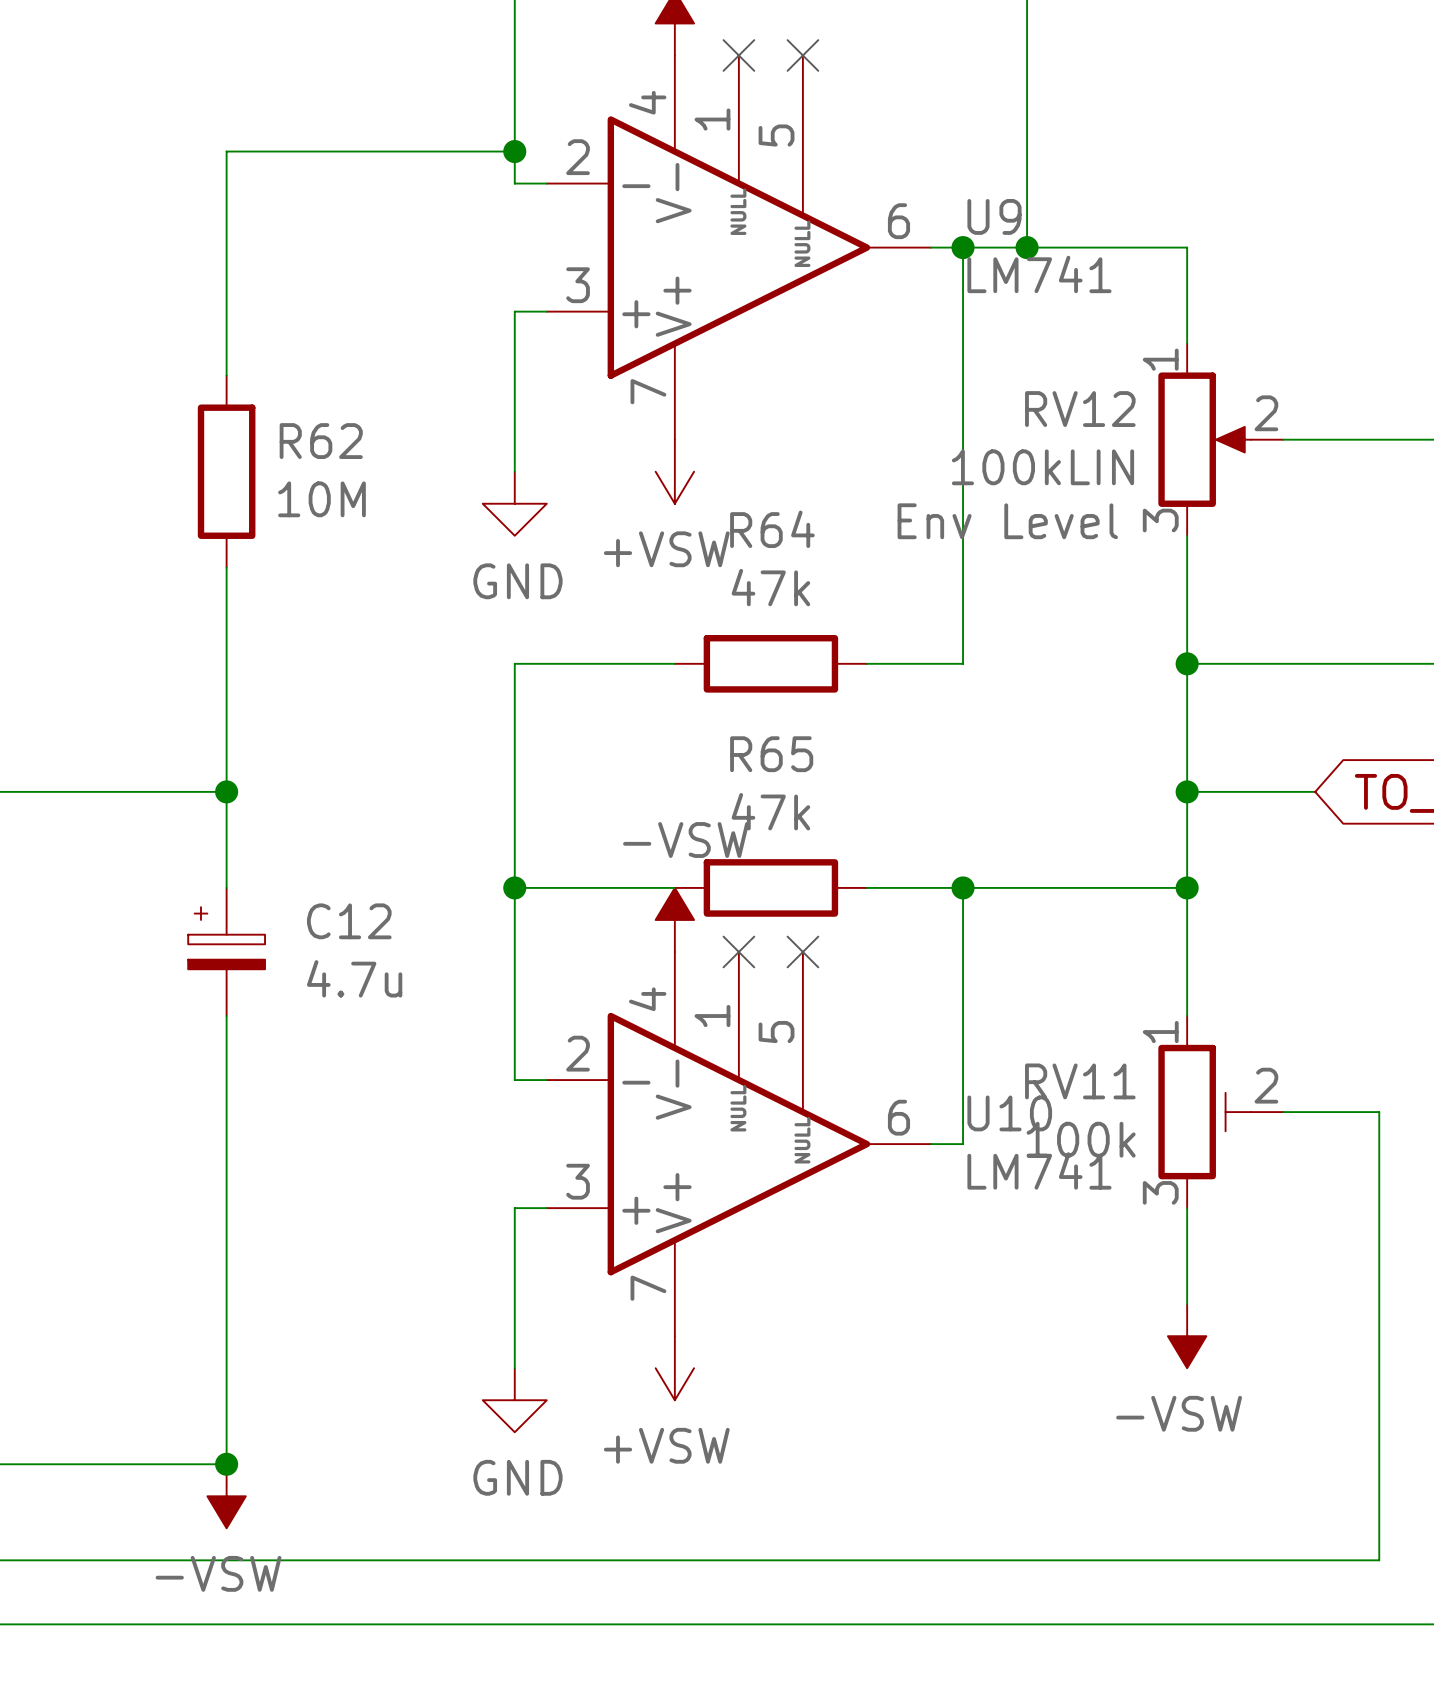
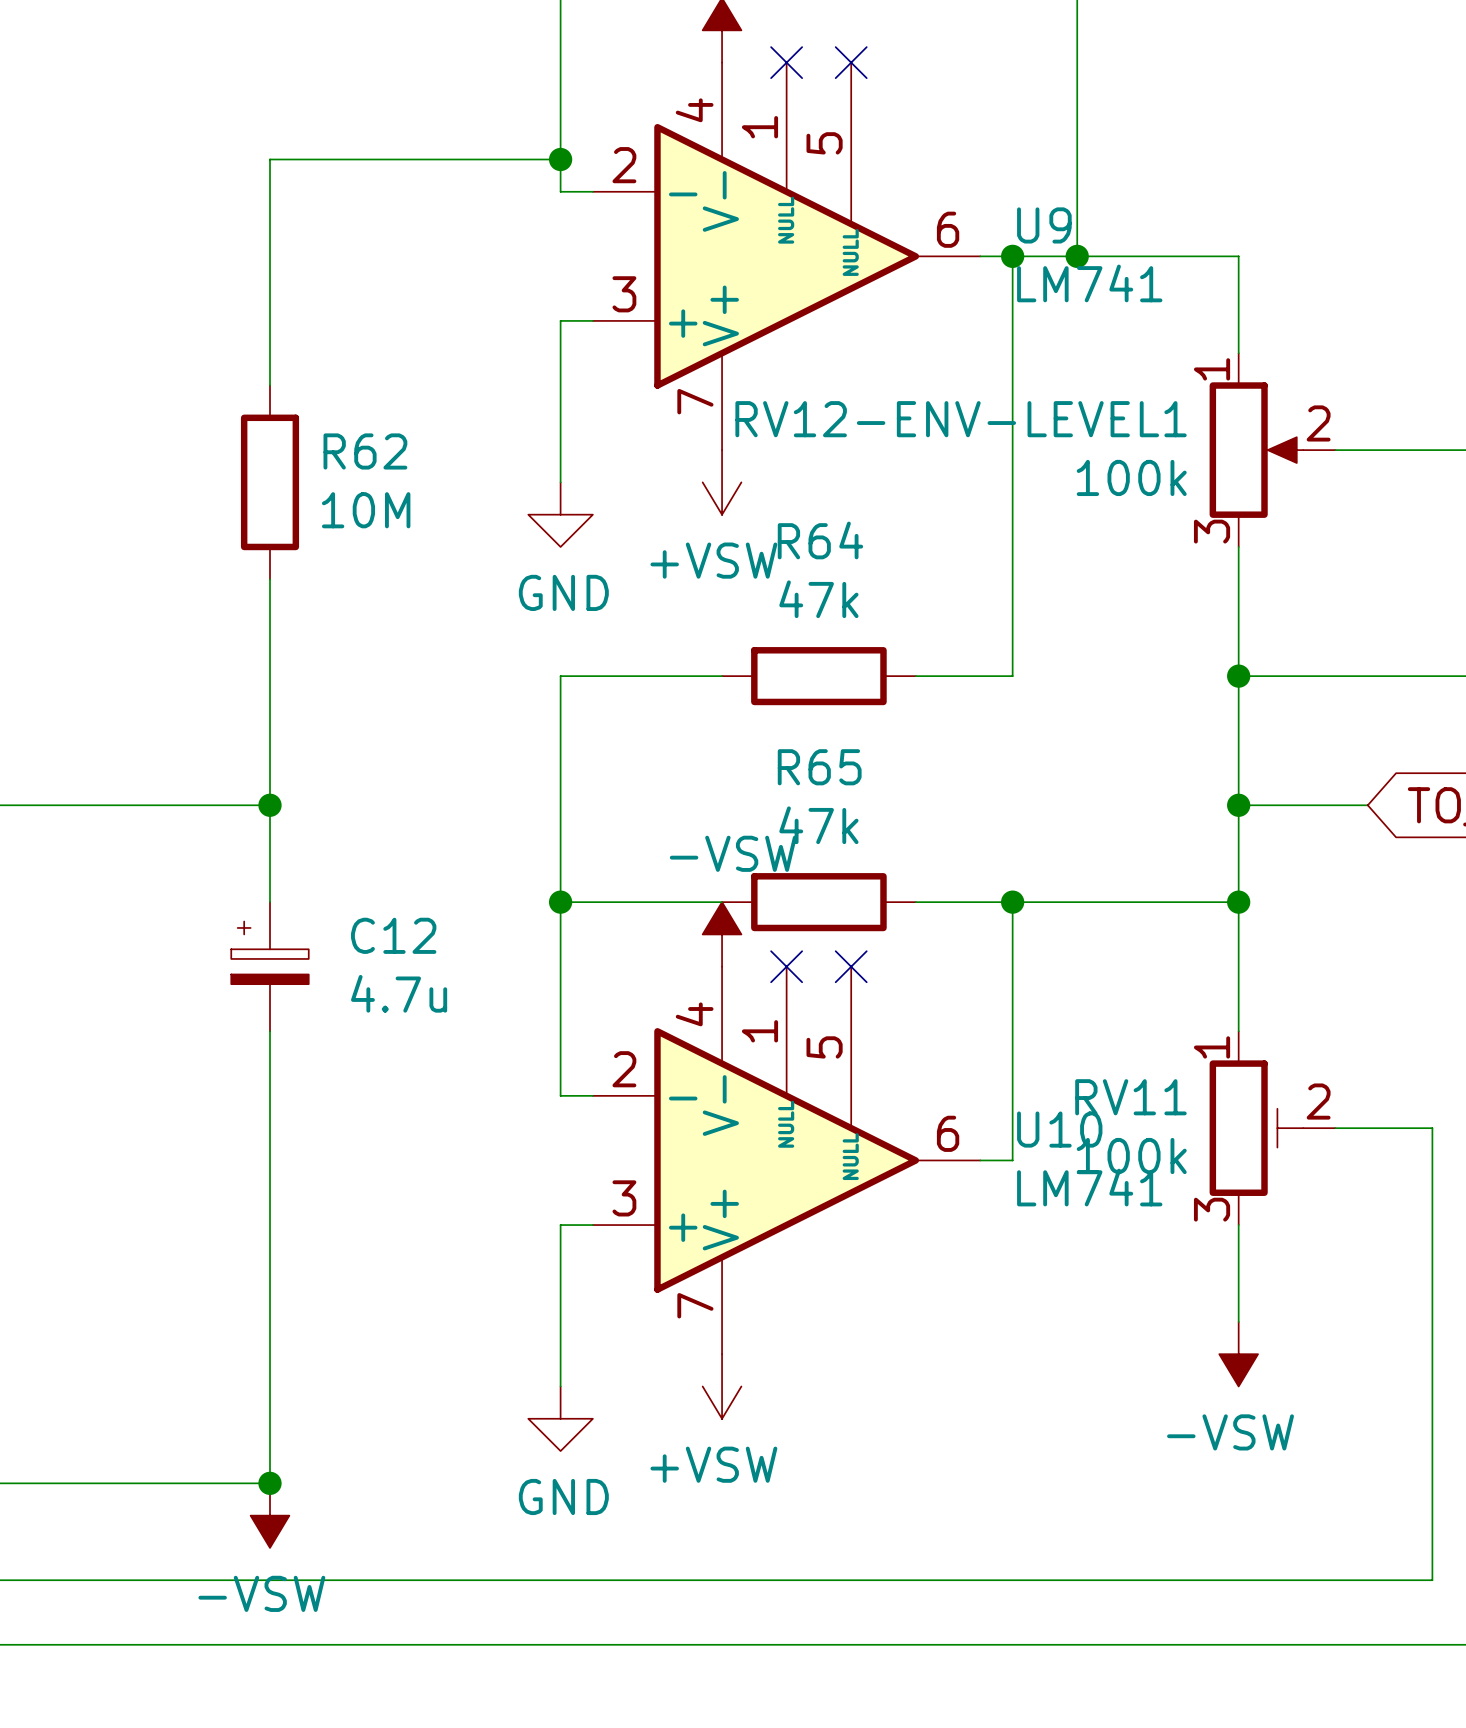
RV12 name: RV12 (1080, 409) -> RV12-ENV-LEVEL1 (961, 419)
RV12 value: 100kLIN (1042, 467) -> 100k (1131, 477)
RV12 text: Env Level (1007, 521) -> none

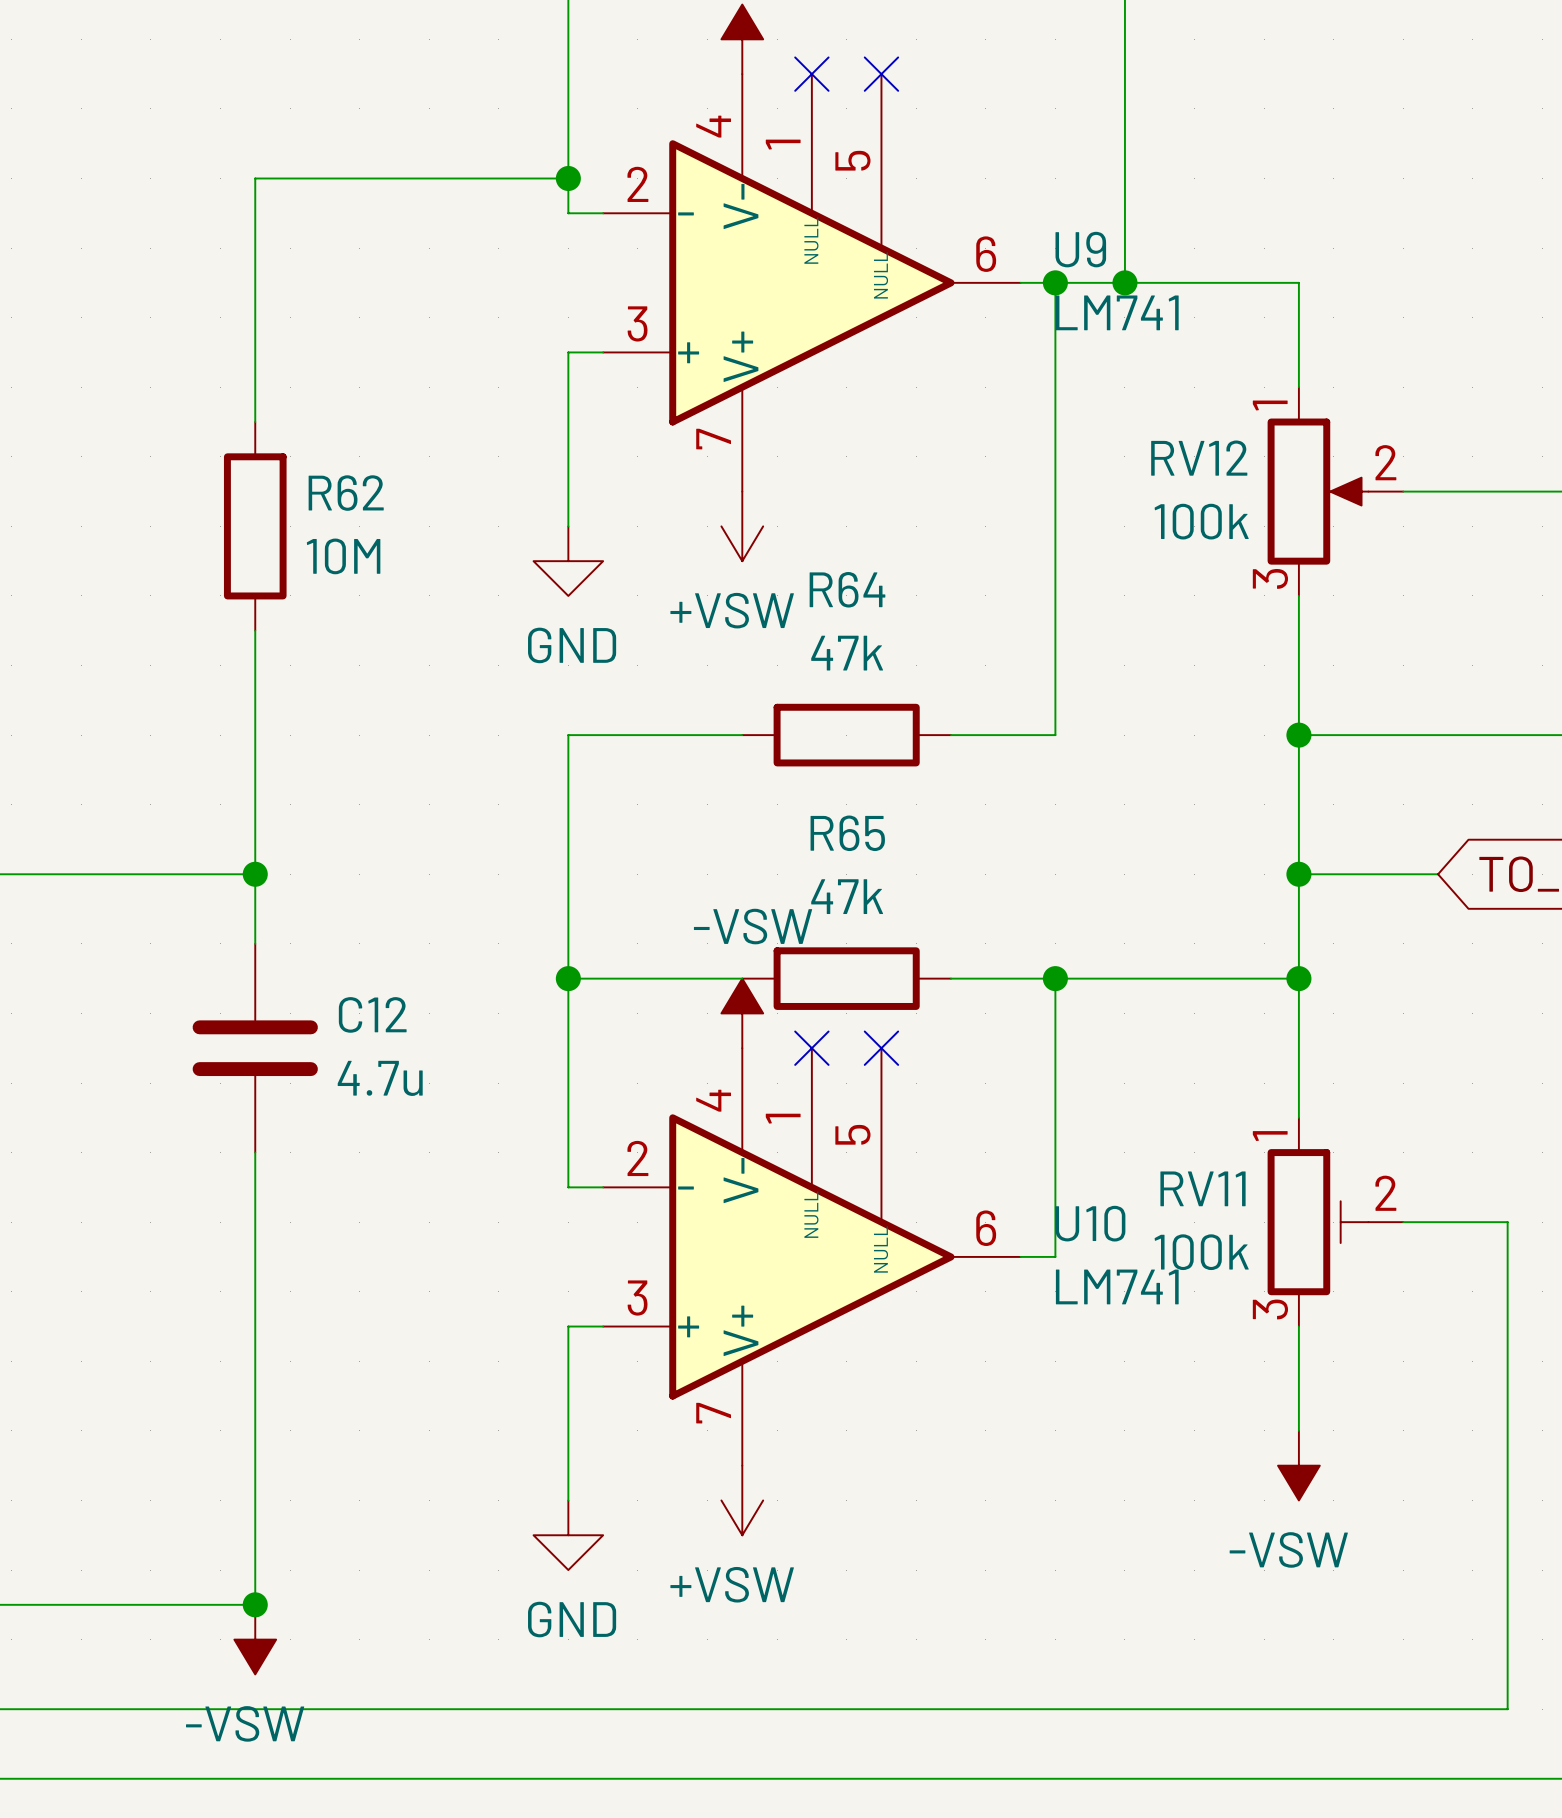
RV12-ENV-LEVEL1 name: RV12-ENV-LEVEL1 (961, 419) -> RV12 (1199, 458)
C12 symbol: [231, 902, 309, 1032] -> [192, 943, 318, 1153]

